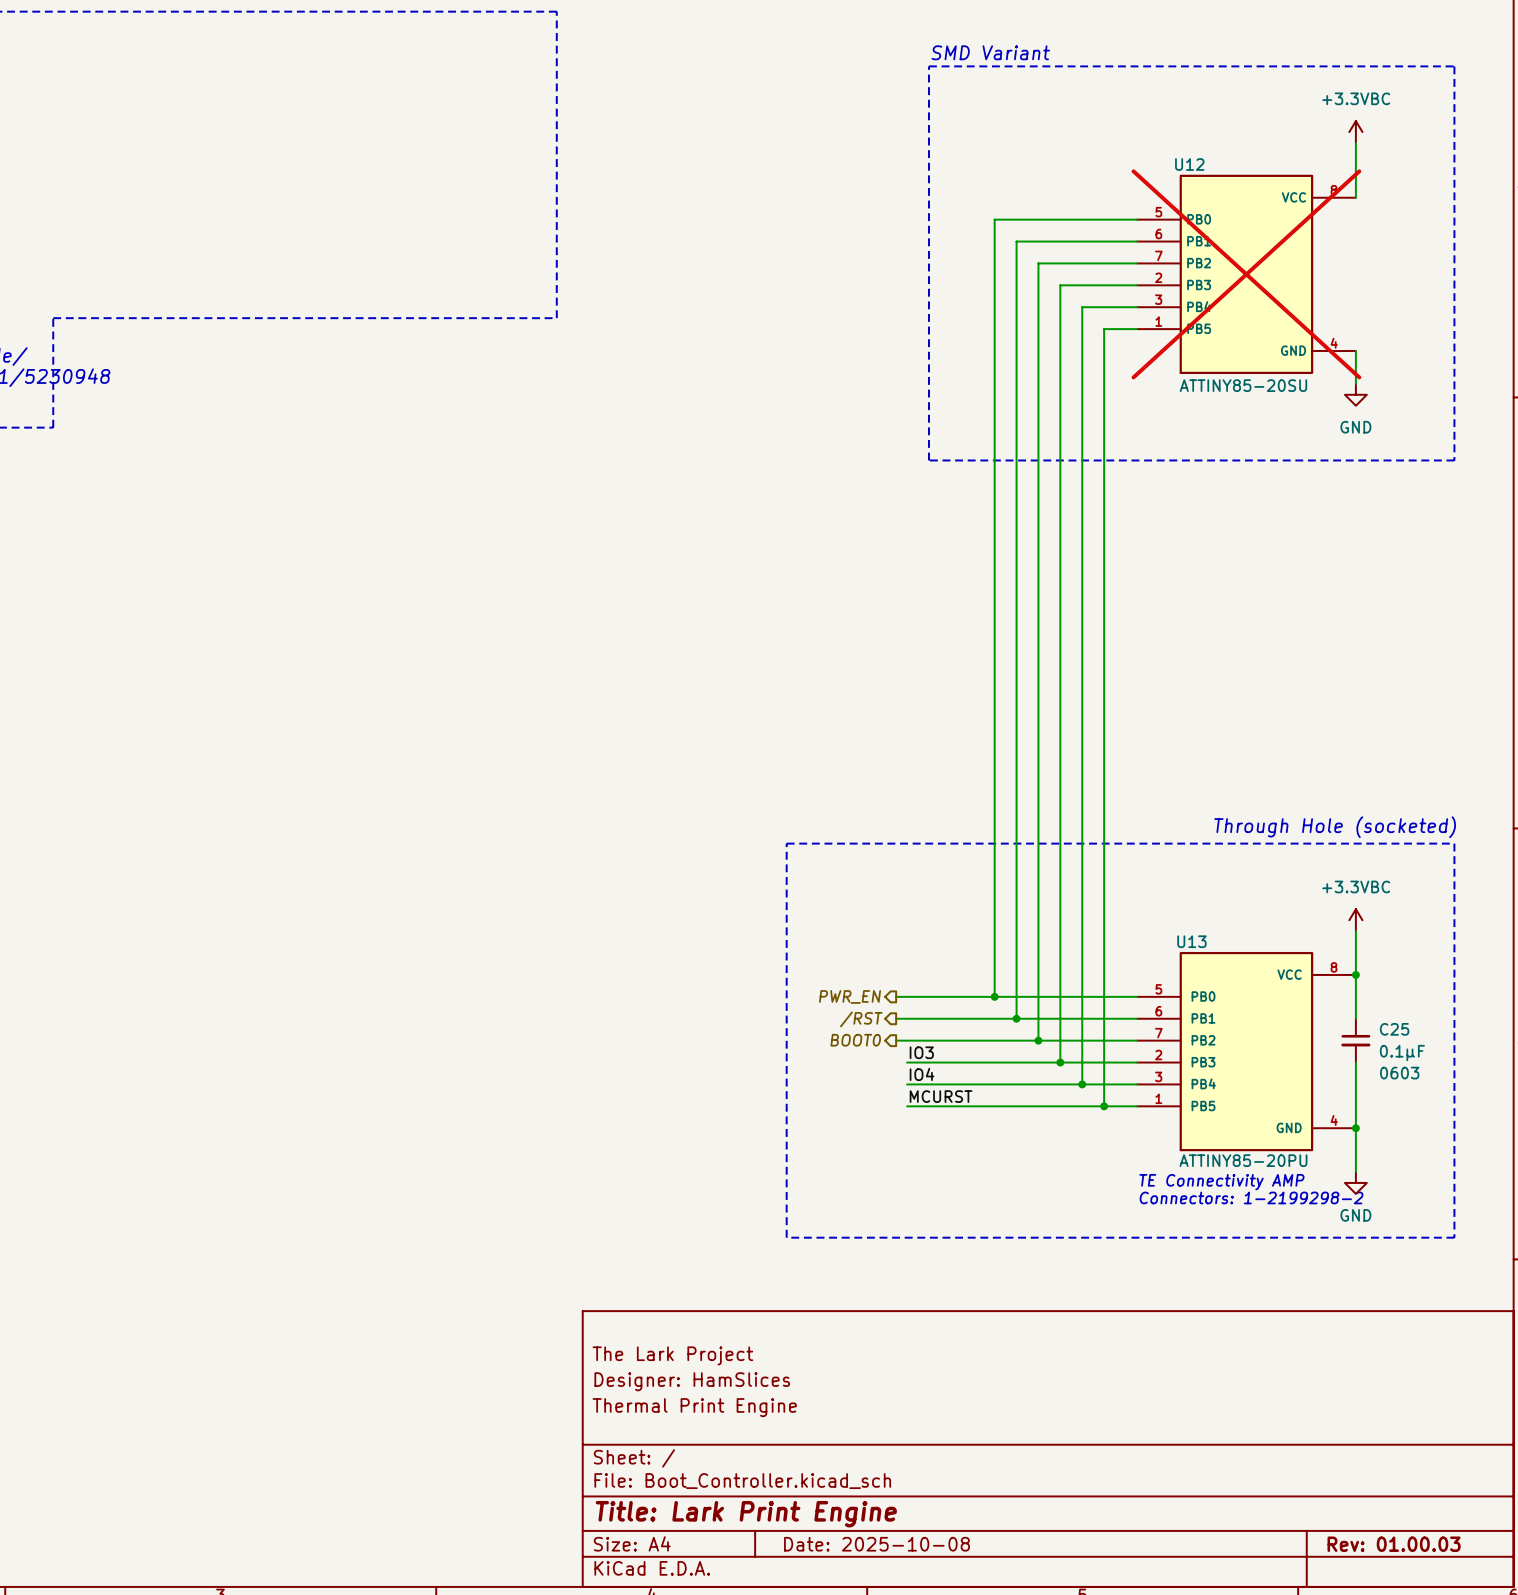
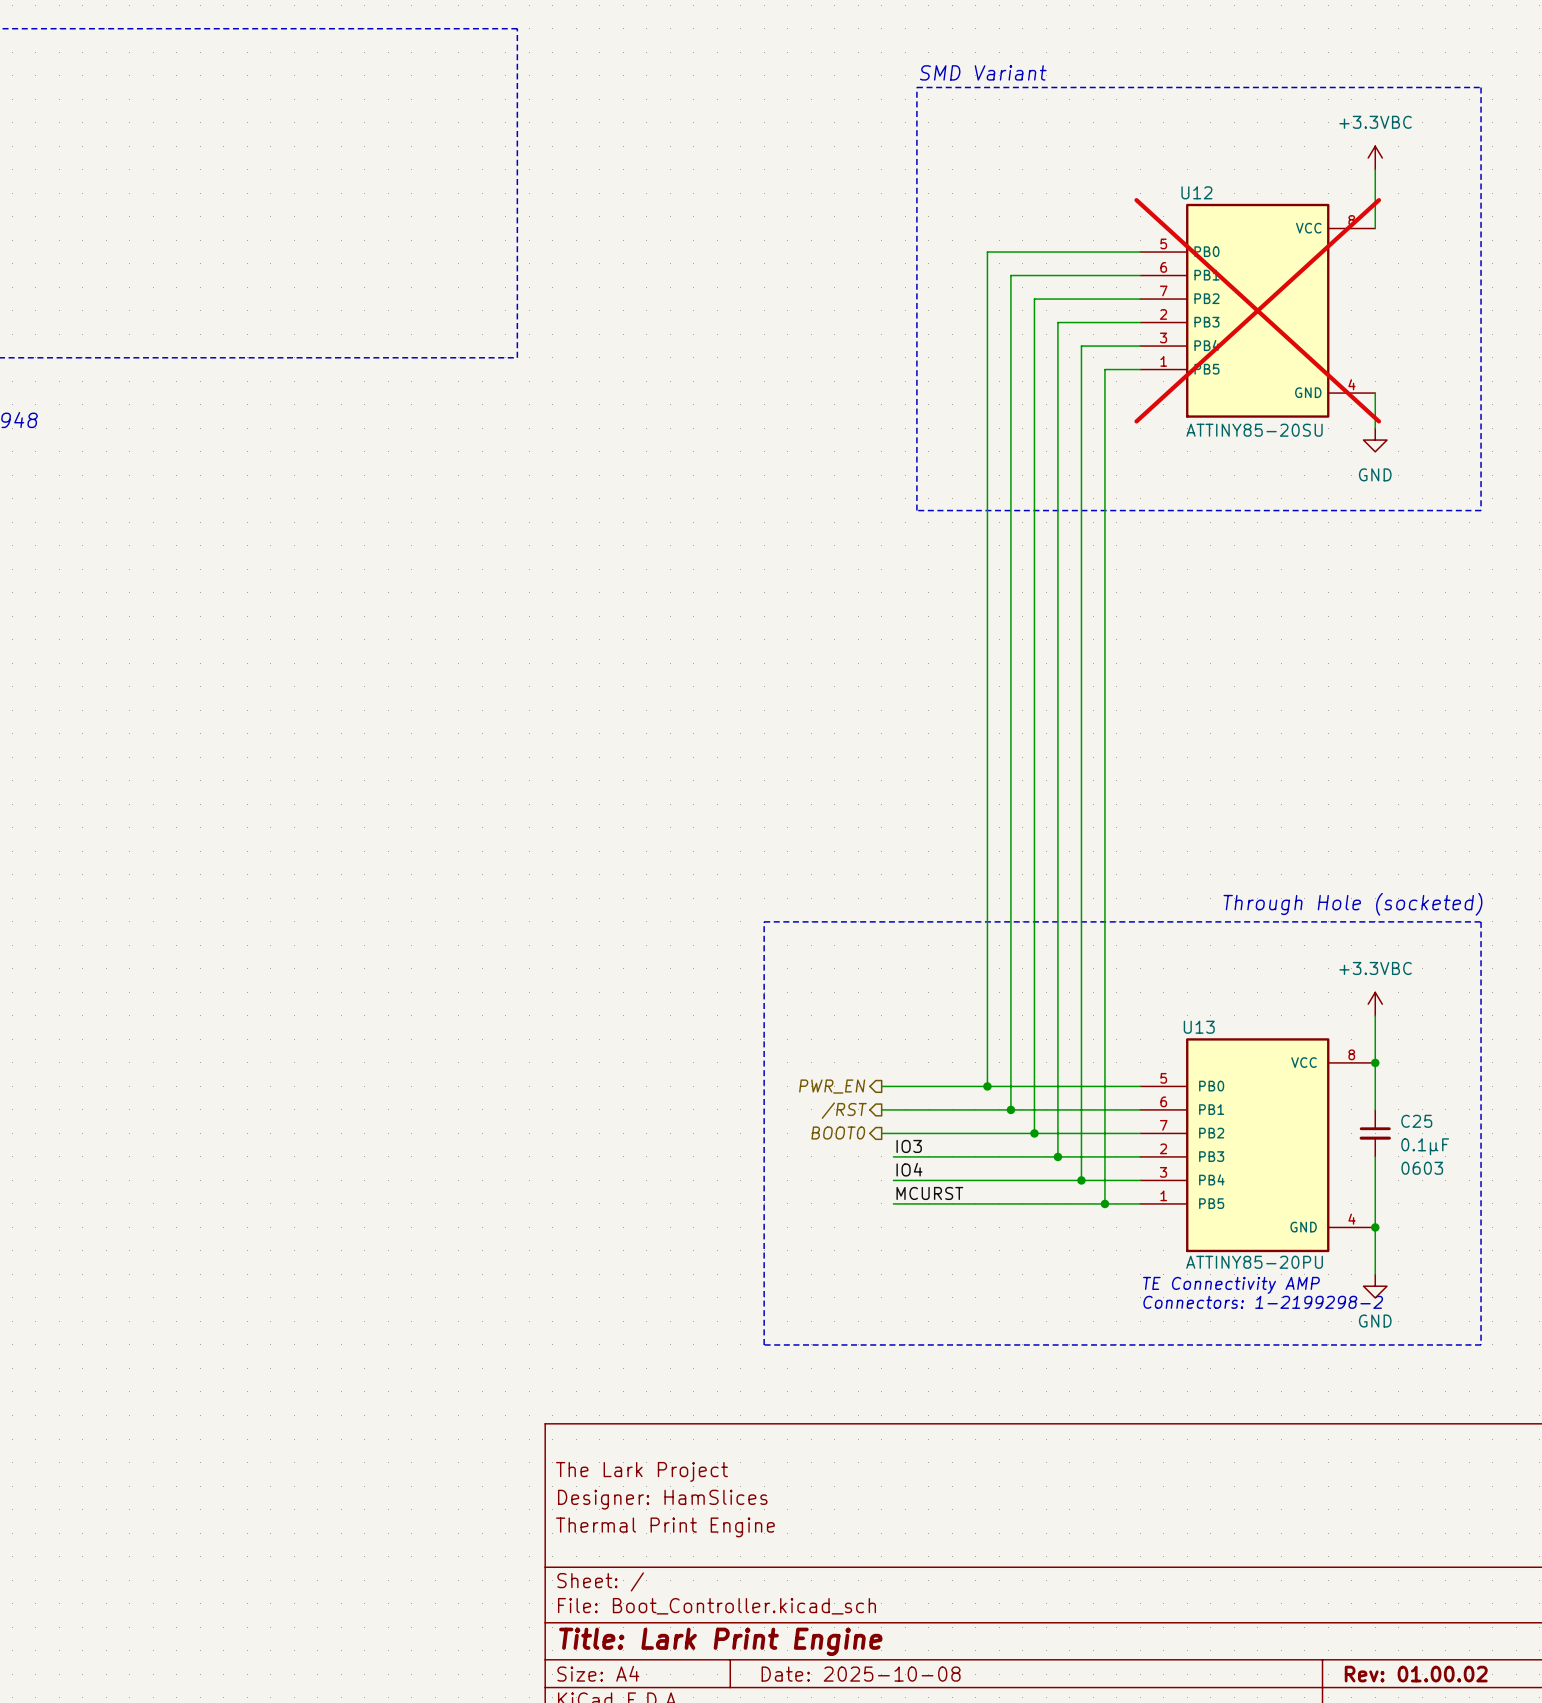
title block: Rev: 01.00.03 (1394, 1544) -> Rev: 01.00.02 (1416, 1674)

